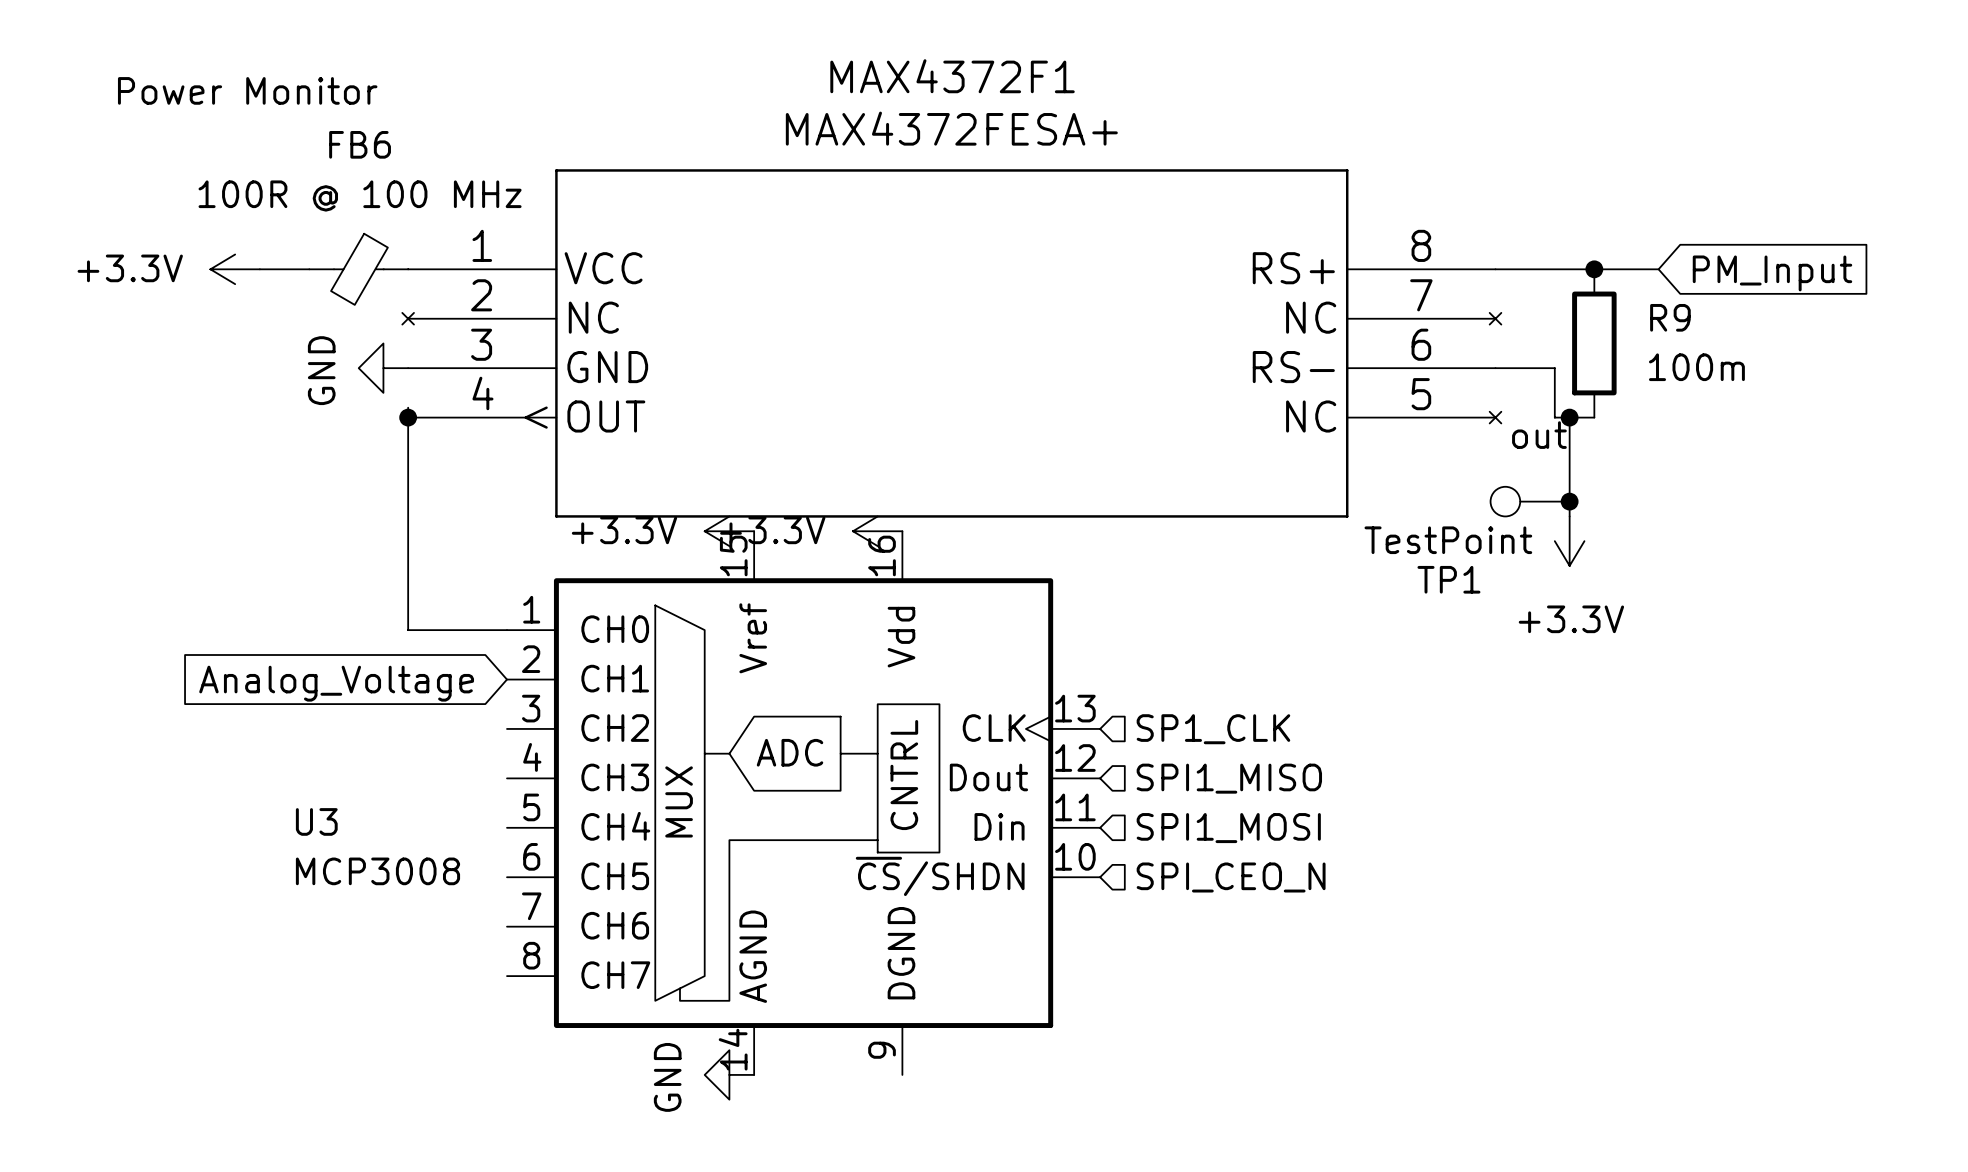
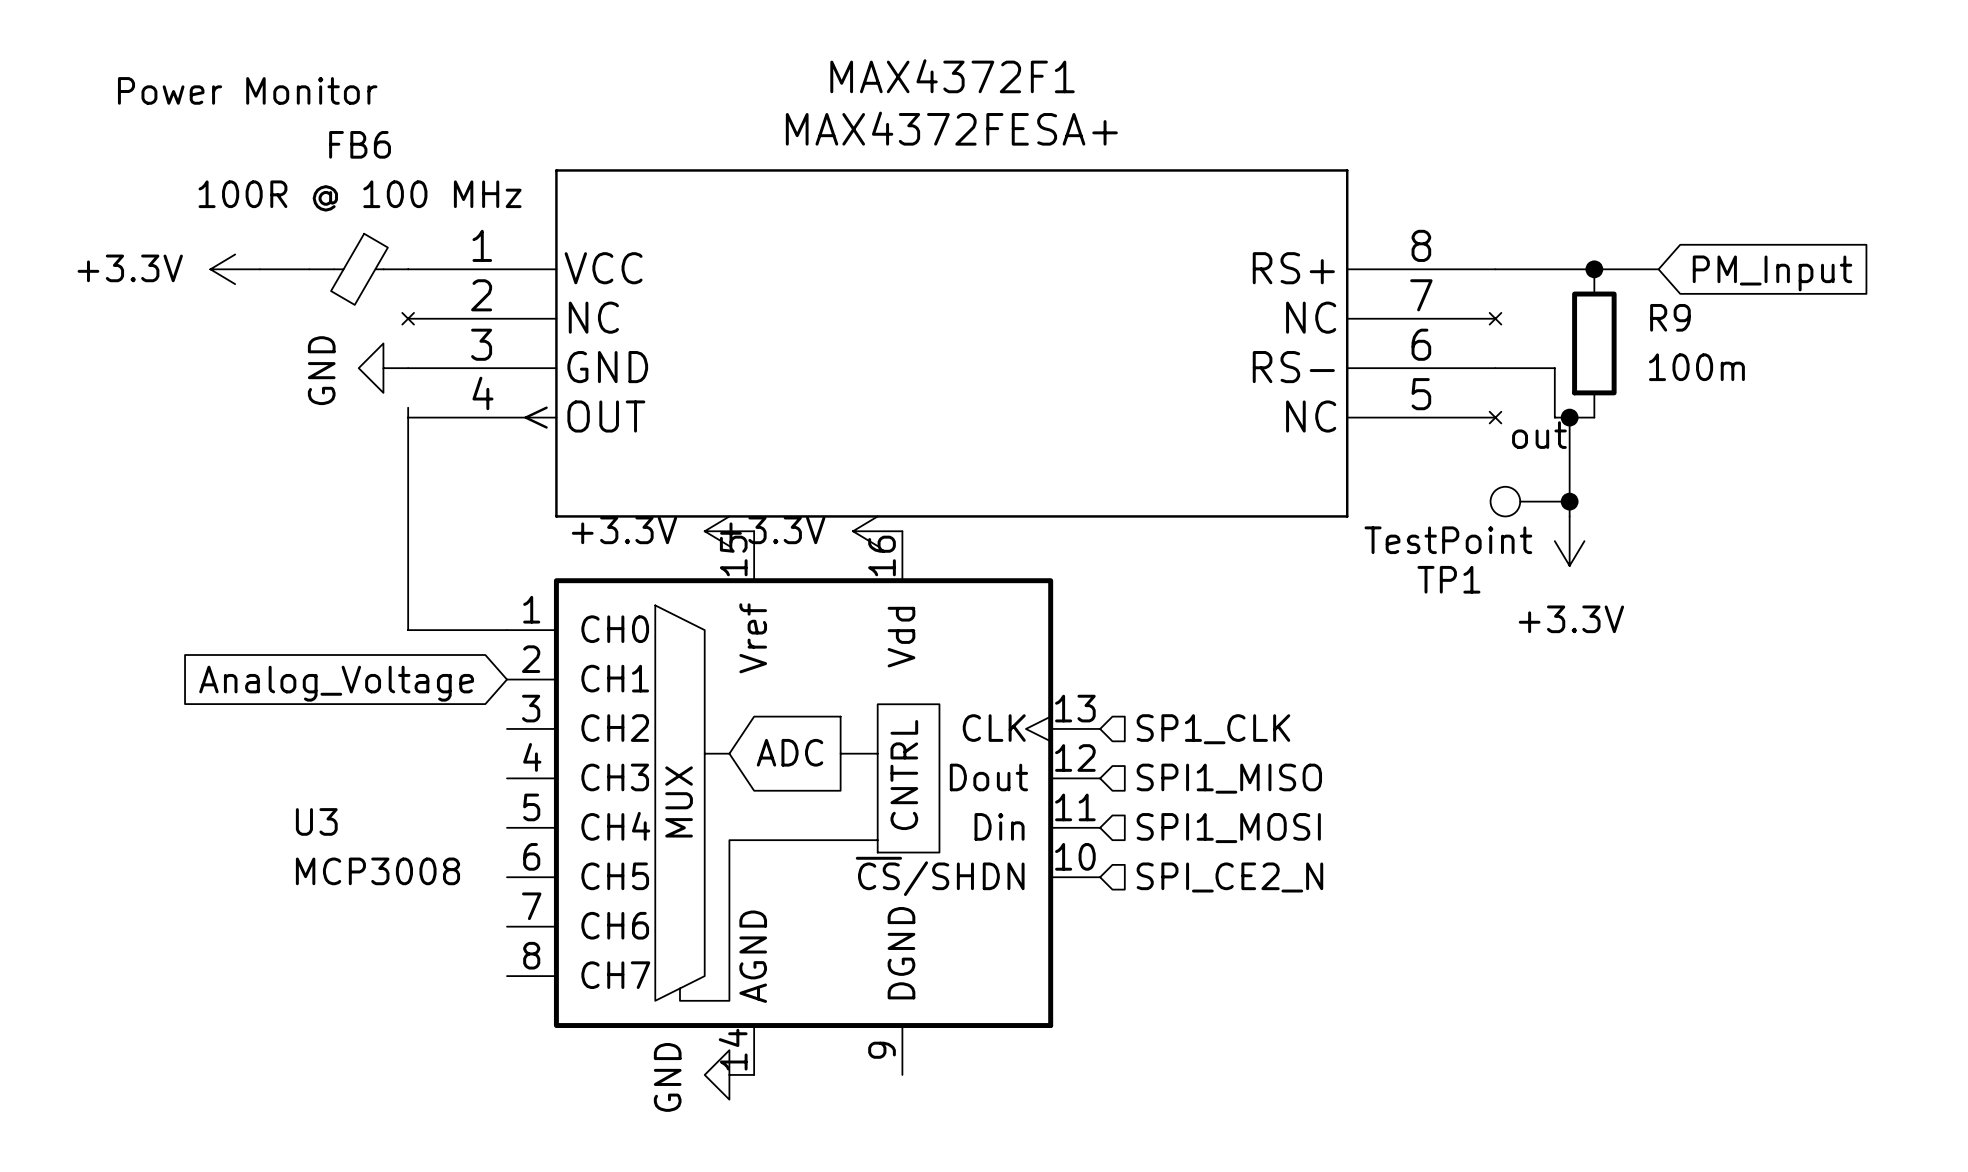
junction: (408, 417) -> none
hierarchical label: SPI_CEO_N (1231, 877) -> SPI_CE2_N (1229, 877)

